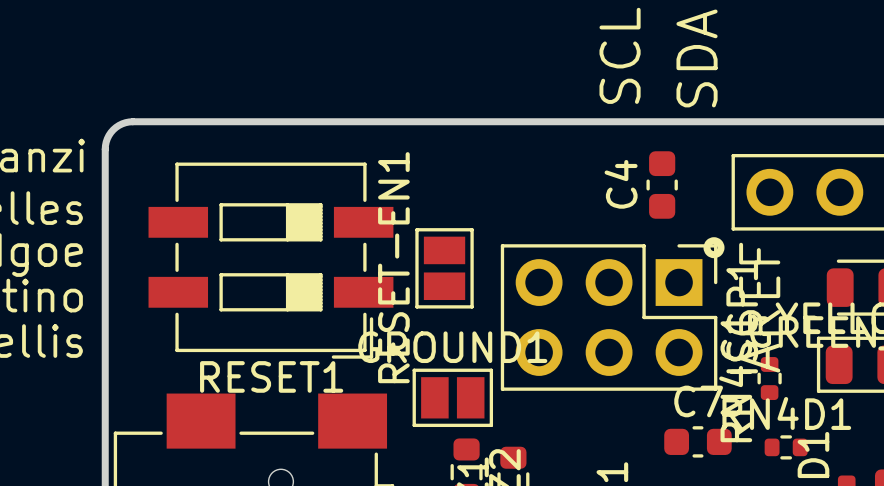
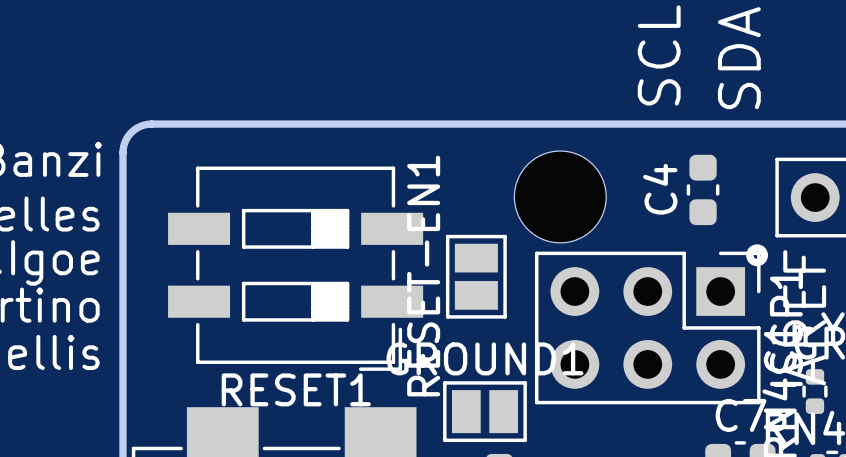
part: none -> (560, 196)

